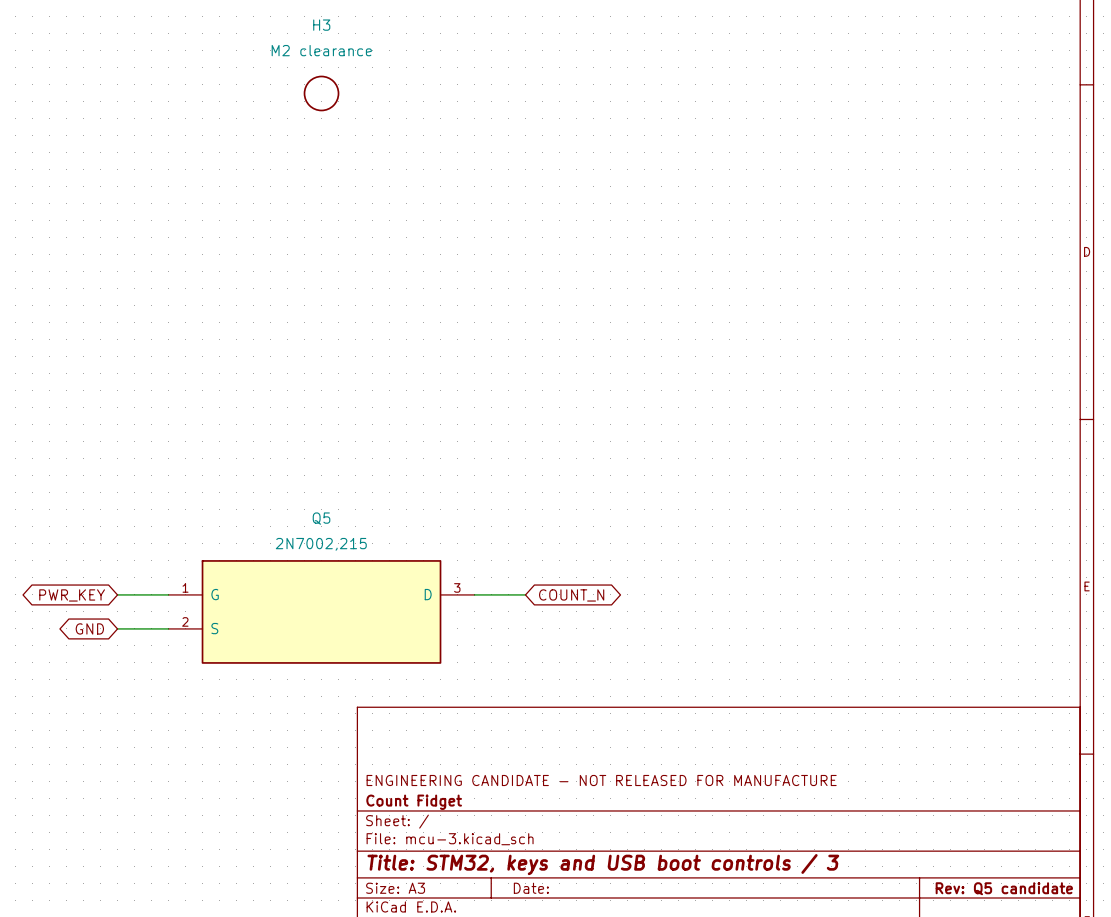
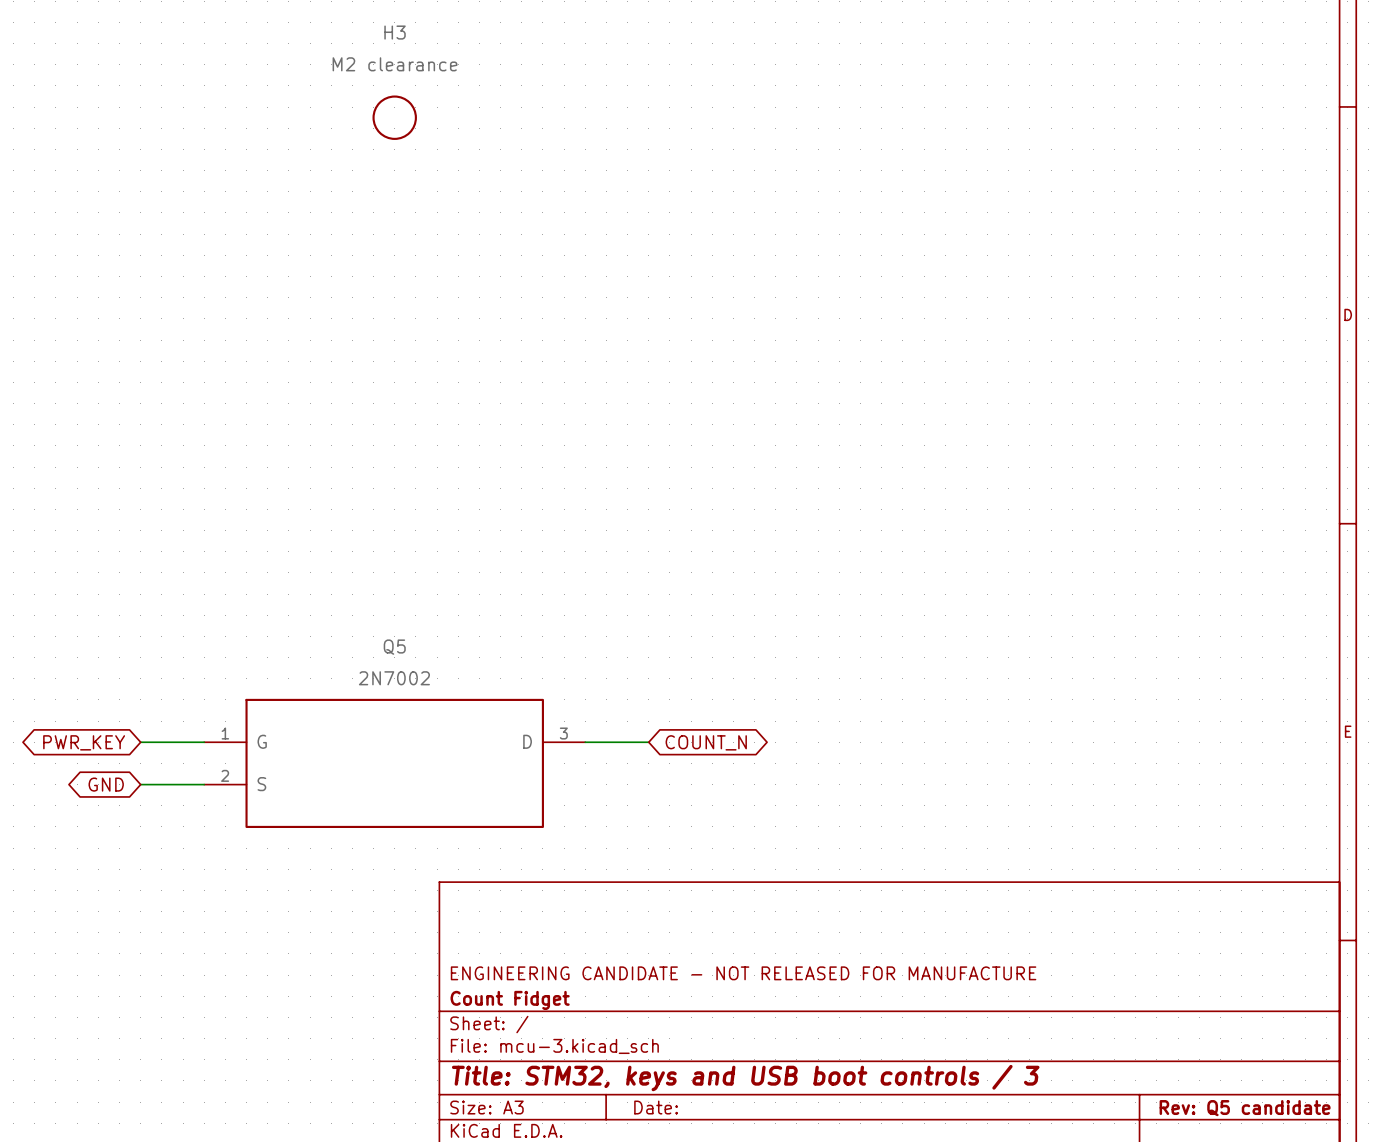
Q5 text: 2N7002,215 (321, 544) -> 2N7002 (394, 678)

